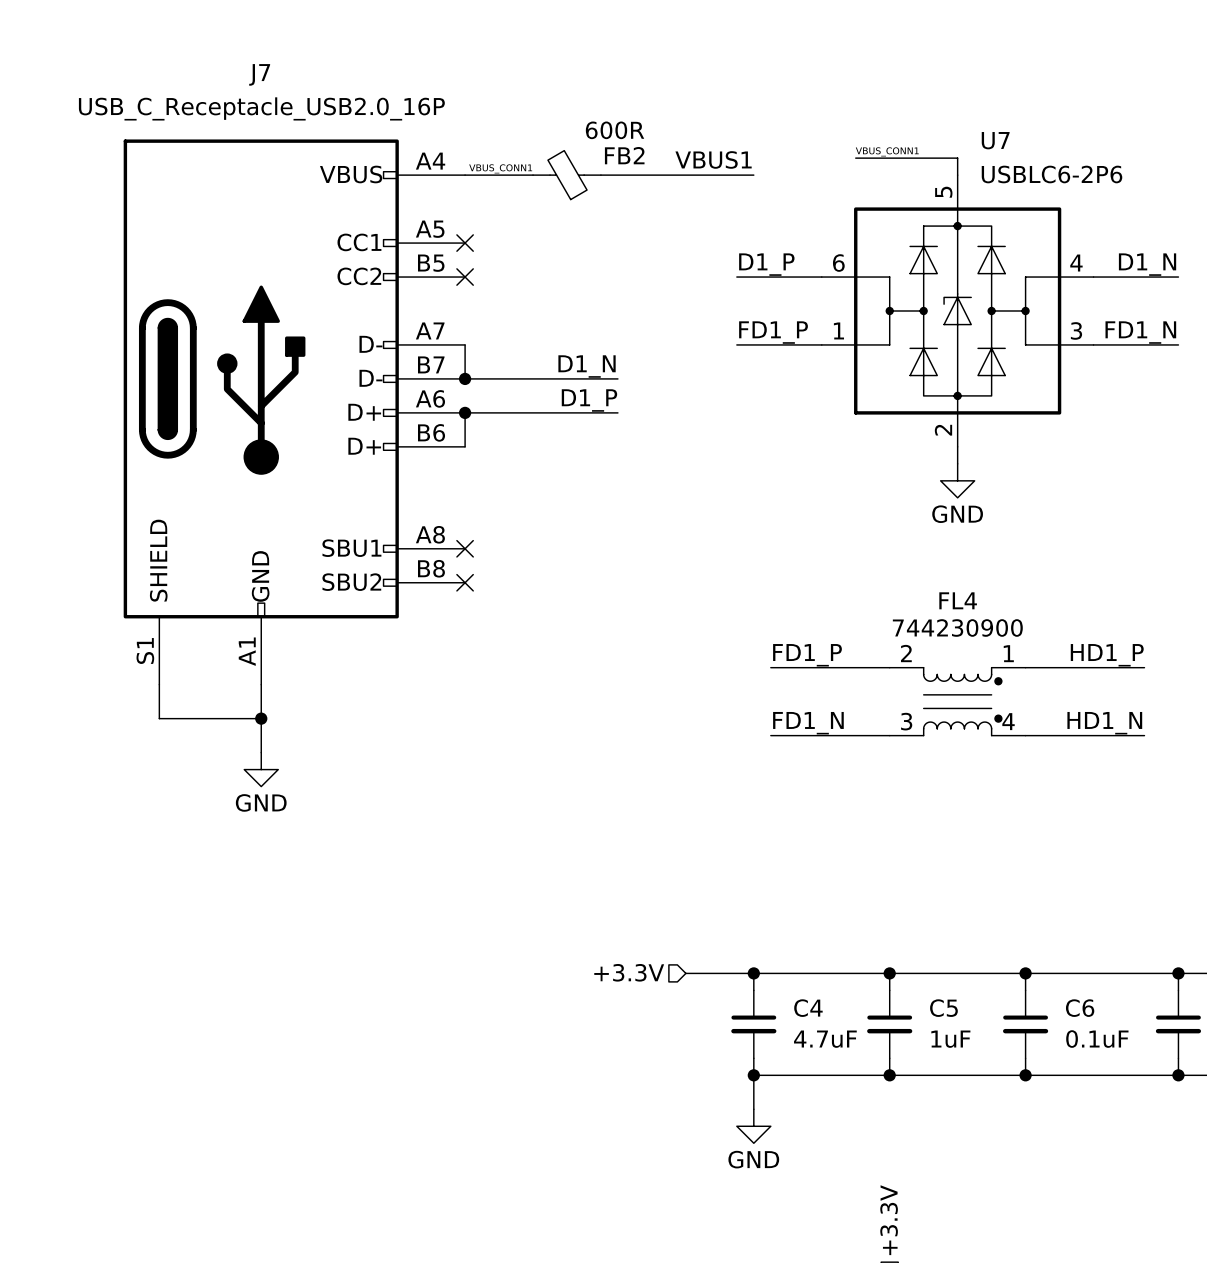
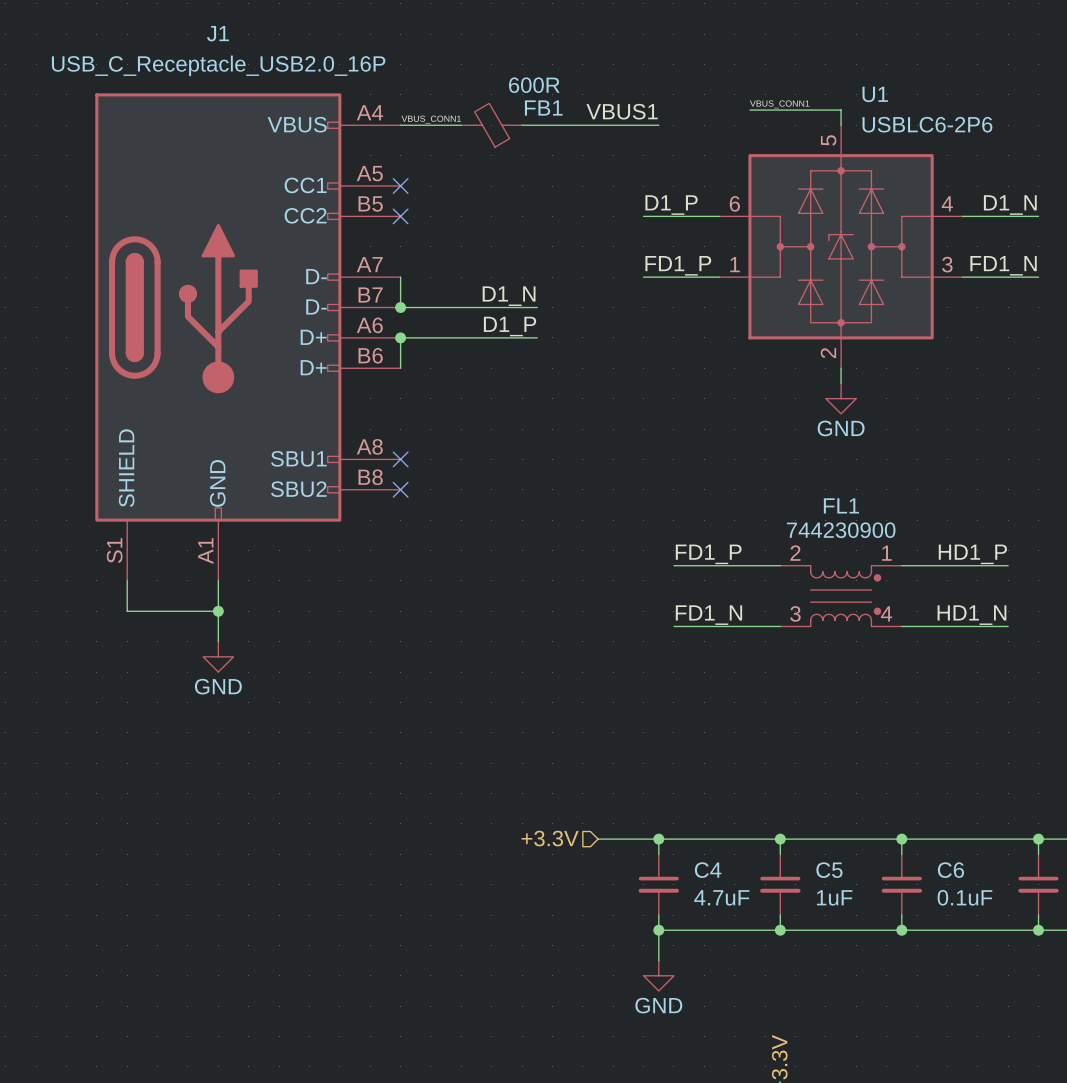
J7 name: J7 (259, 74) -> J1 (217, 33)
U7 name: U7 (995, 140) -> U1 (875, 94)
FB2 name: FB2 (624, 155) -> FB1 (543, 107)
FL4 name: FL4 (958, 600) -> FL1 (841, 505)

